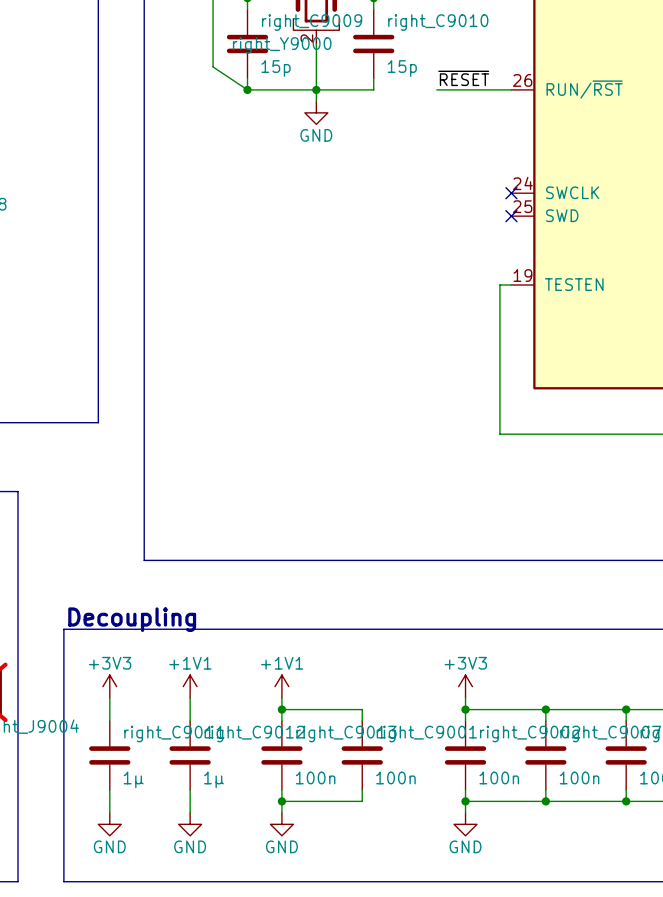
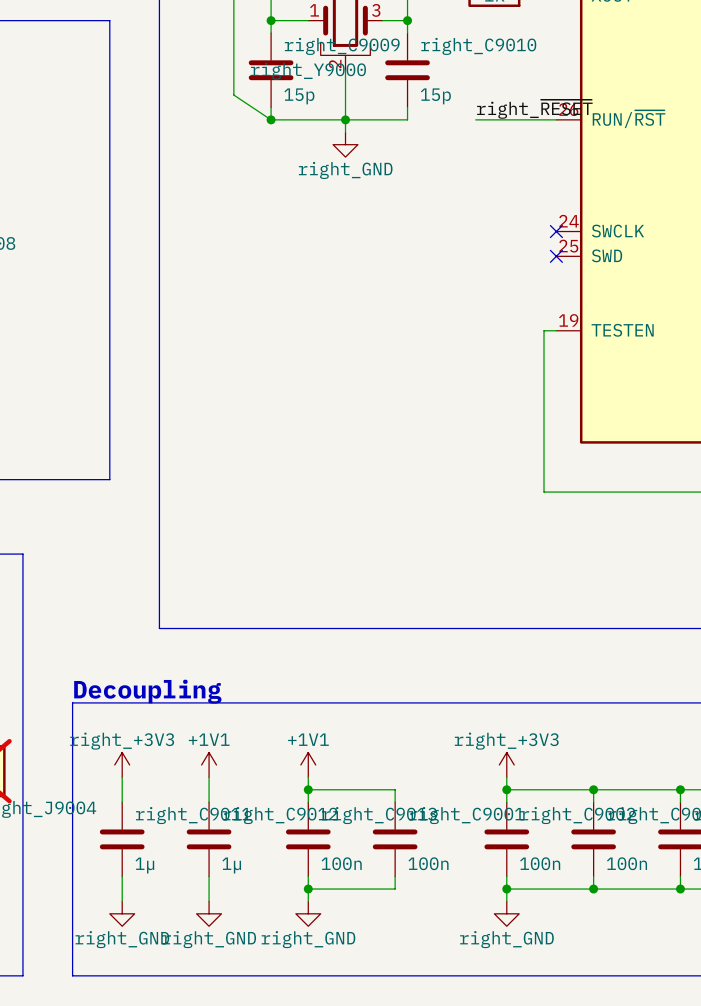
label: ~{RESET} (463, 78) -> right_~{RESET} (534, 109)
power symbol: GND (316, 112) -> right_GND (345, 144)
power symbol: +3V3 (109, 686) -> right_+3V3 (122, 764)
power symbol: +3V3 (465, 686) -> right_+3V3 (506, 764)
power symbol: GND (109, 824) -> right_GND (122, 913)
power symbol: GND (190, 824) -> right_GND (209, 913)
power symbol: GND (281, 824) -> right_GND (308, 913)
power symbol: GND (465, 824) -> right_GND (506, 913)

